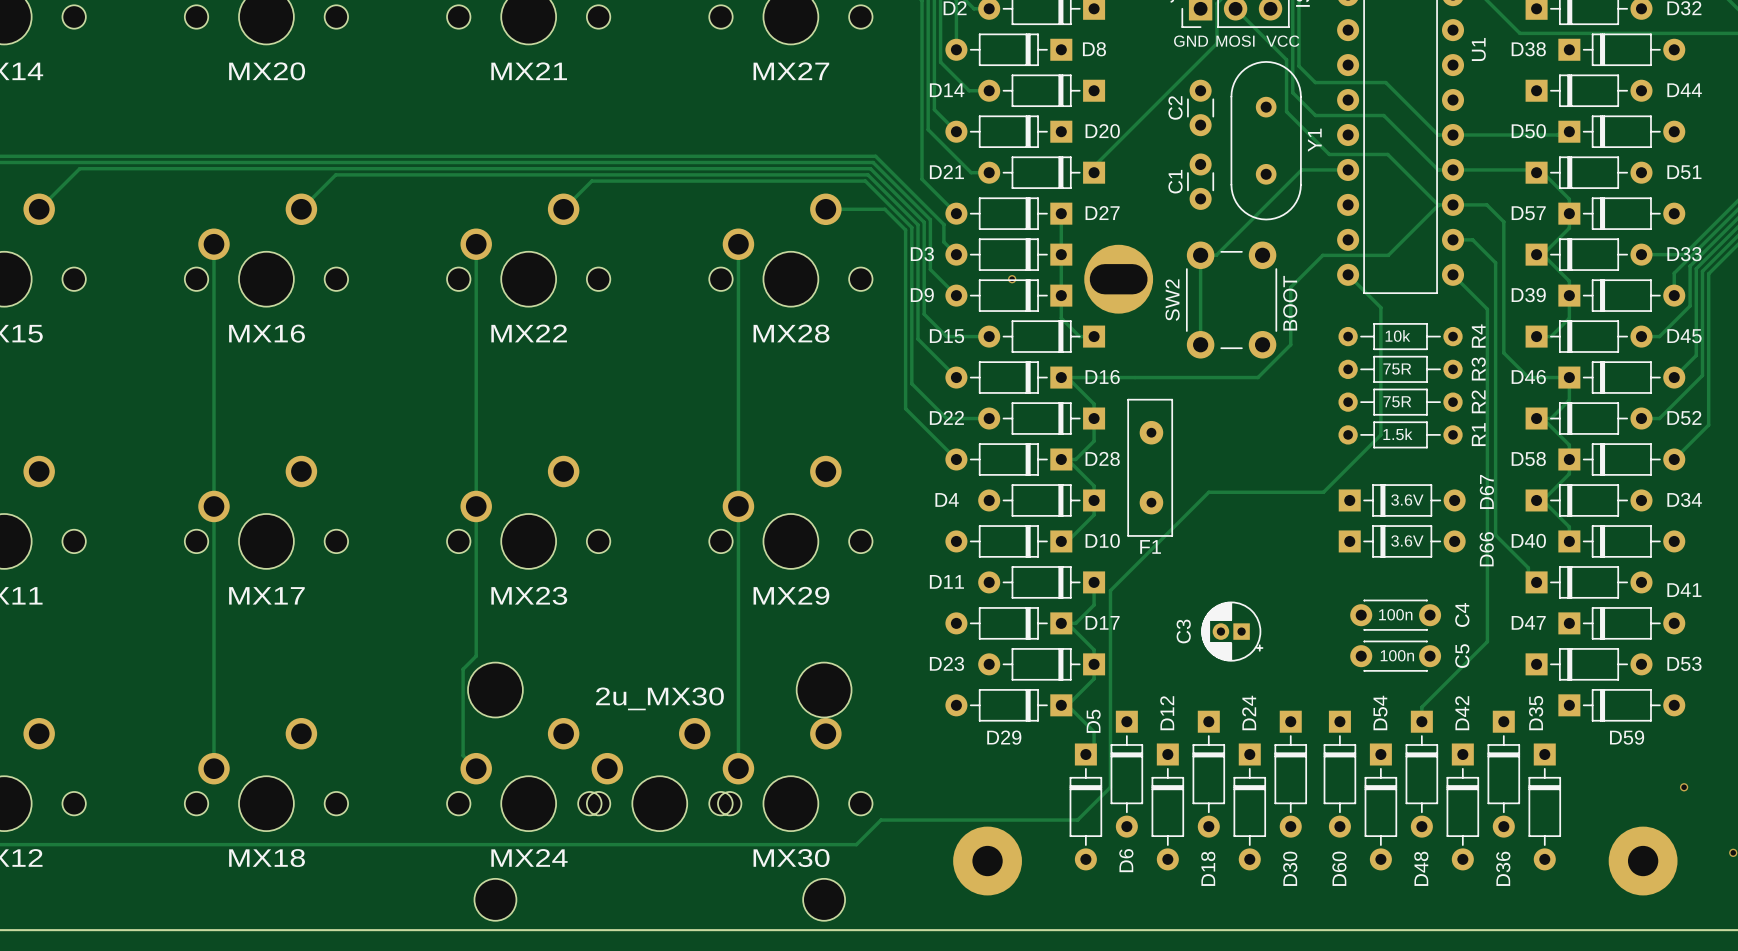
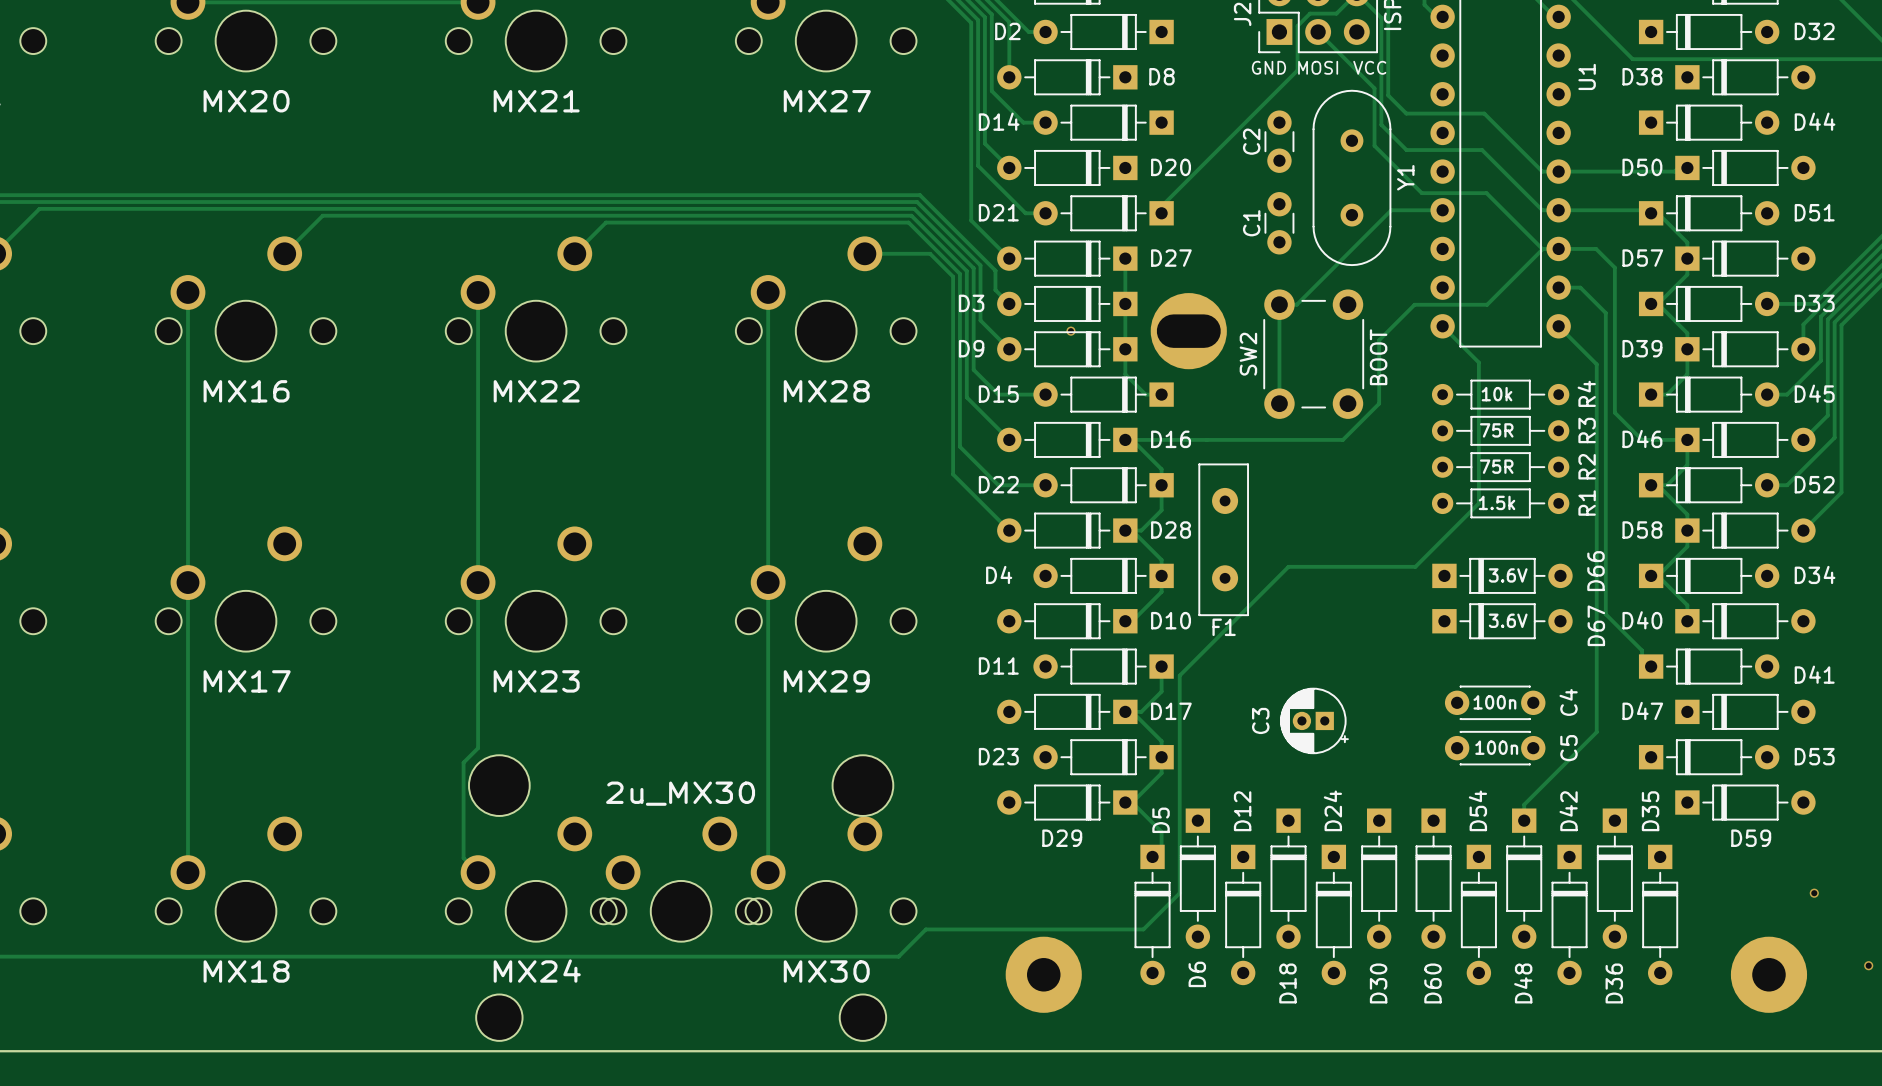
D67 name: D67 (1486, 491) -> D66 (1595, 571)
D66 name: D66 (1486, 549) -> D67 (1596, 625)

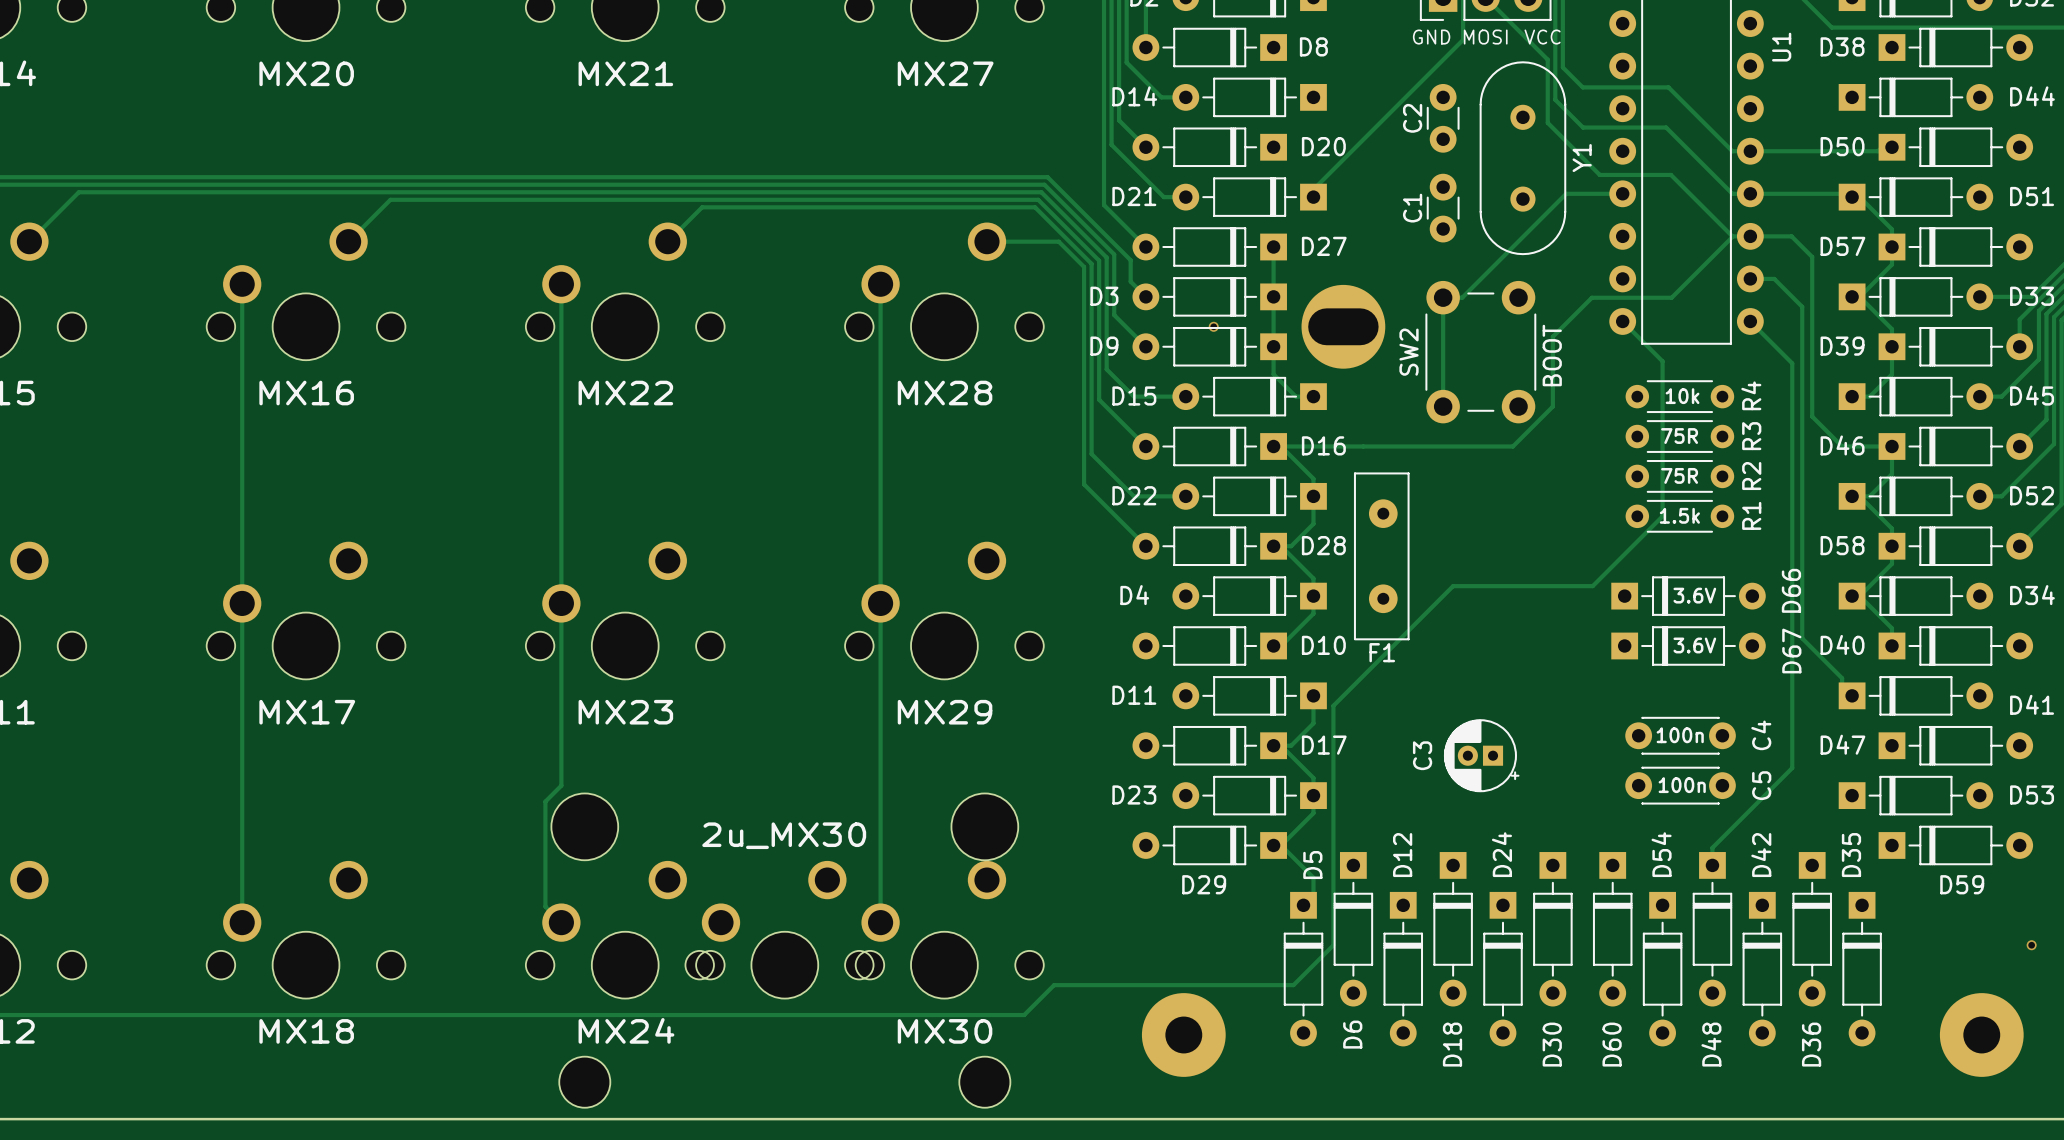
R4 footprint: [1431, 379, 1570, 410] -> [1625, 380, 1735, 414]
R3 footprint: [1431, 415, 1570, 446] -> [1625, 420, 1735, 453]
R2 footprint: [1431, 452, 1570, 483] -> [1625, 460, 1735, 493]
R1 footprint: [1431, 488, 1570, 519] -> [1625, 499, 1735, 533]

